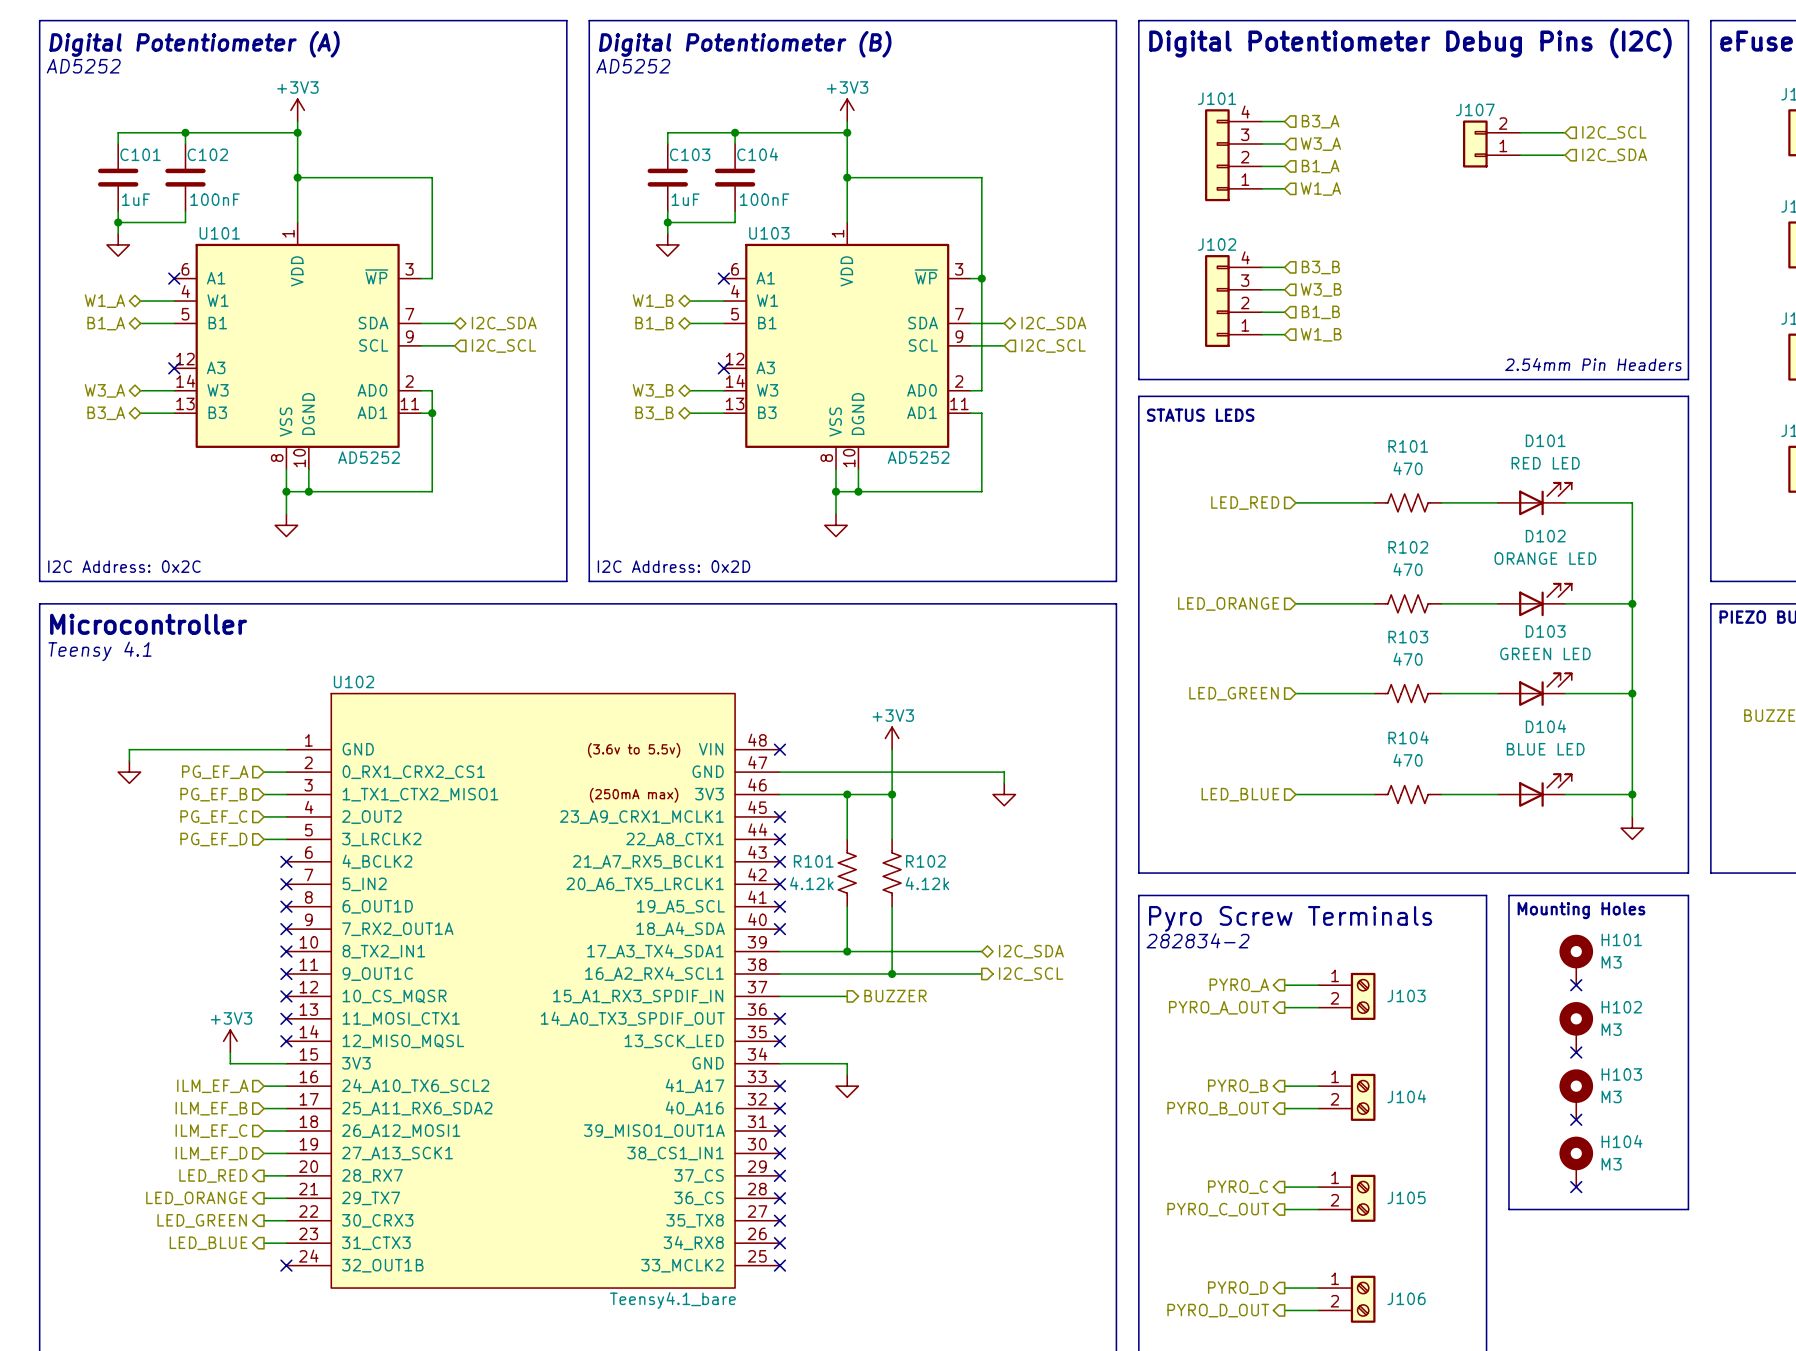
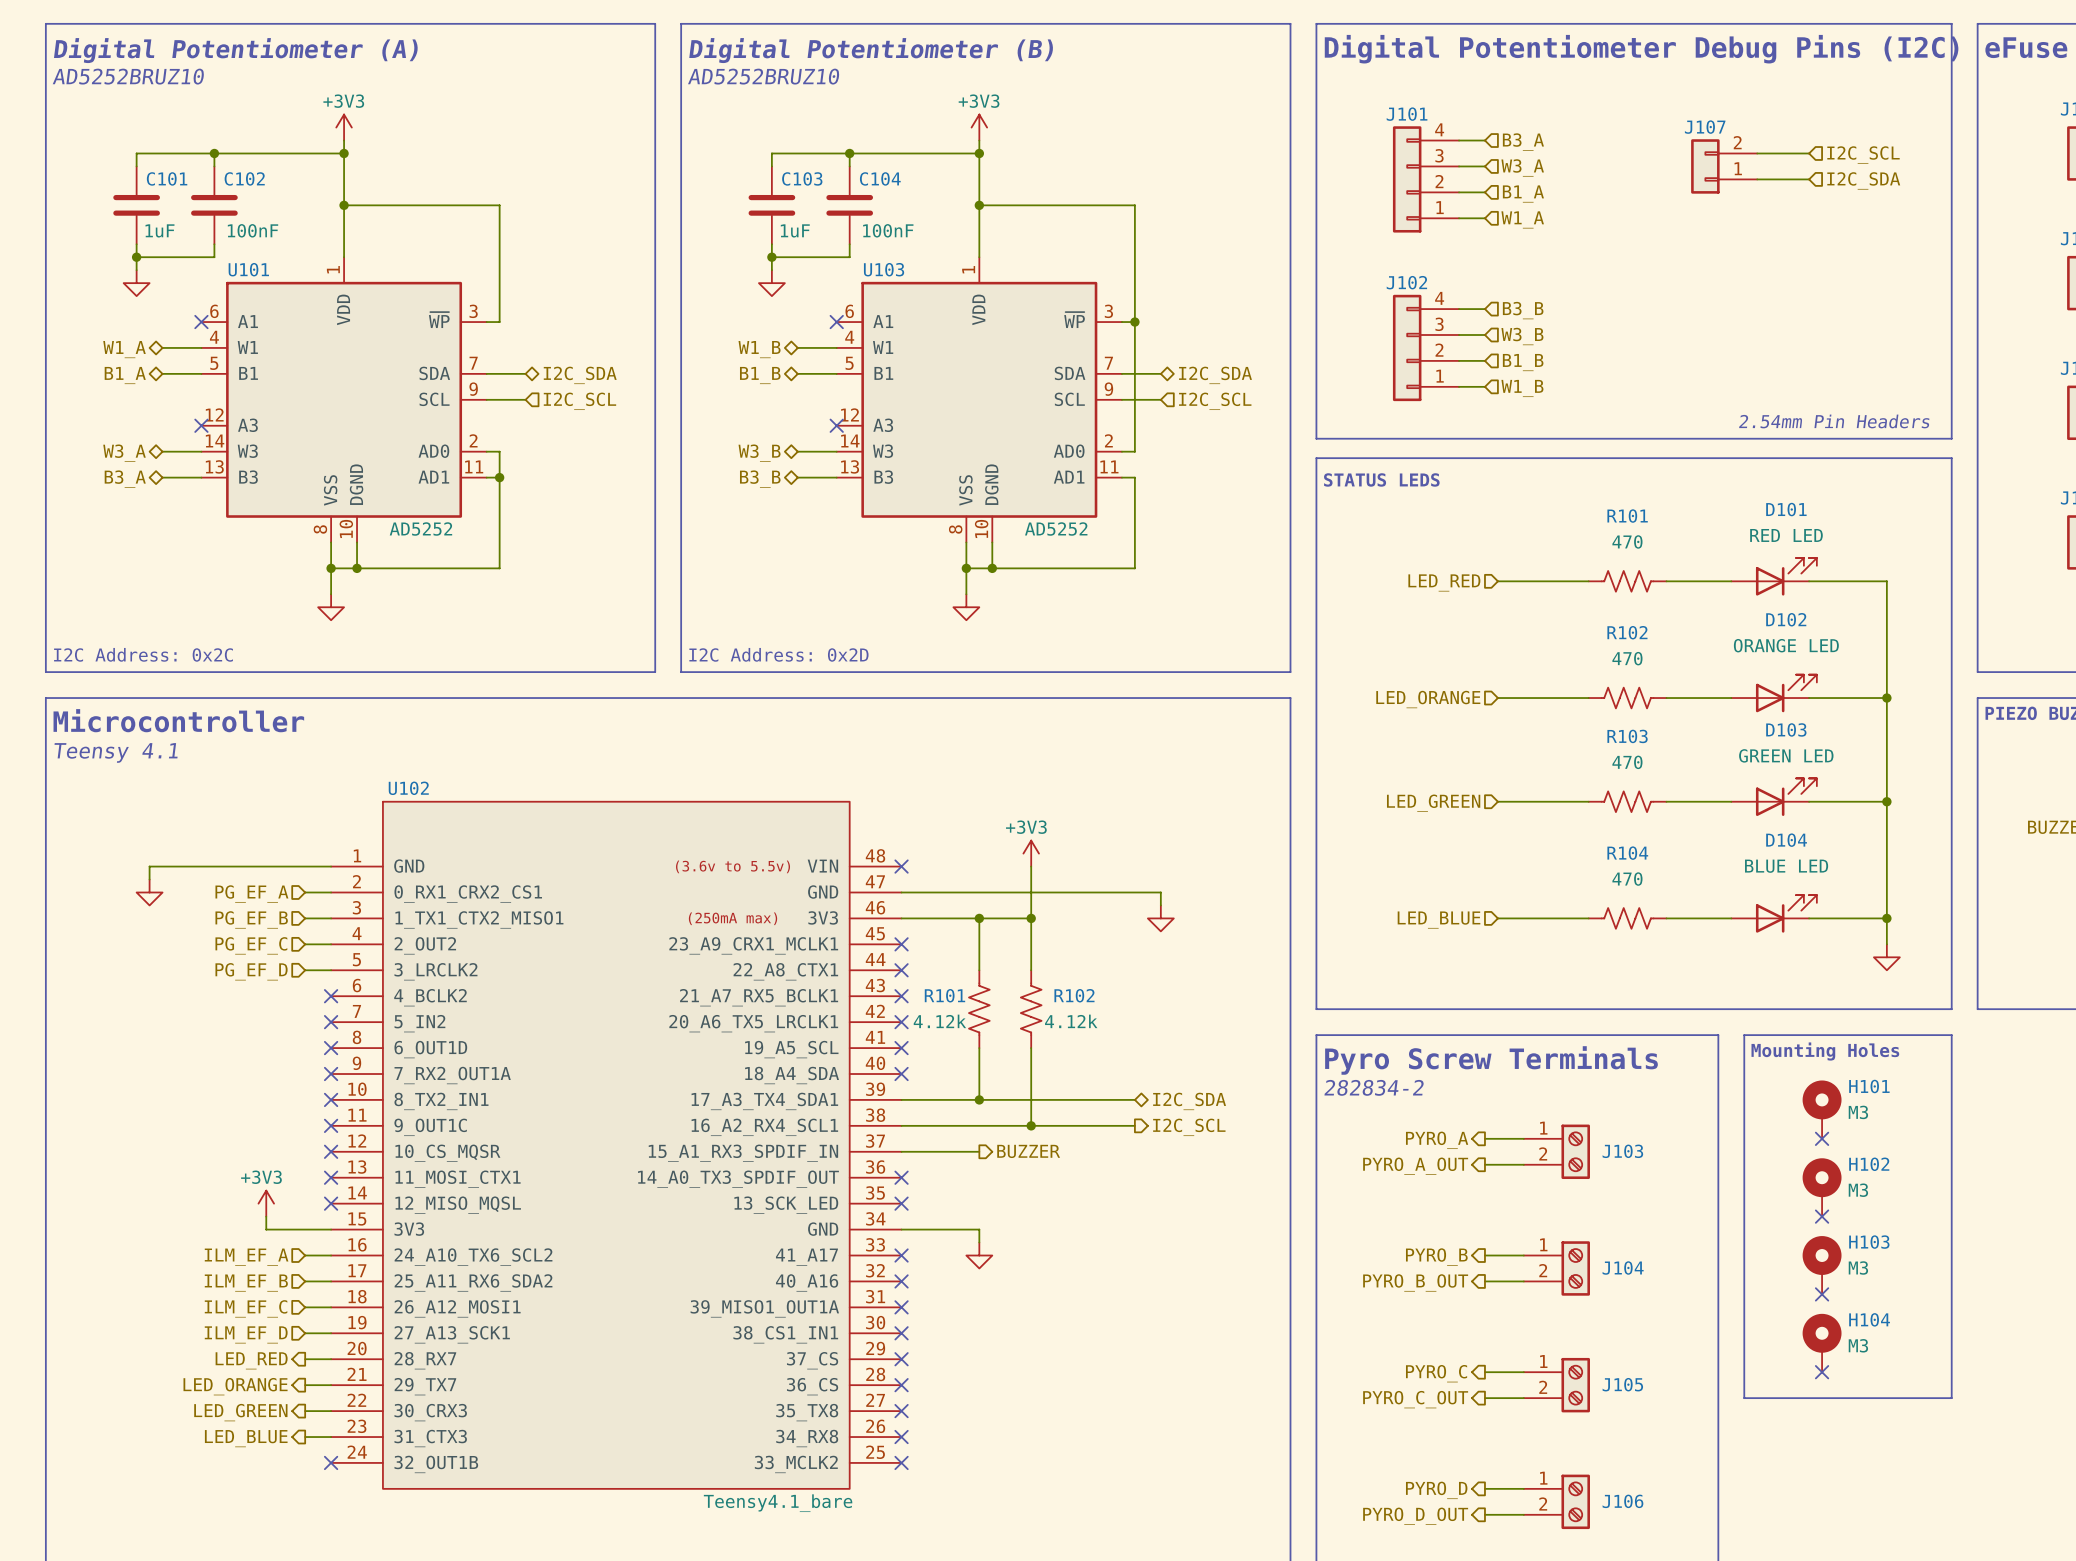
text: AD5252 (83, 66) -> AD5252BRUZ10 (128, 76)
text: AD5252 (633, 66) -> AD5252BRUZ10 (763, 76)

